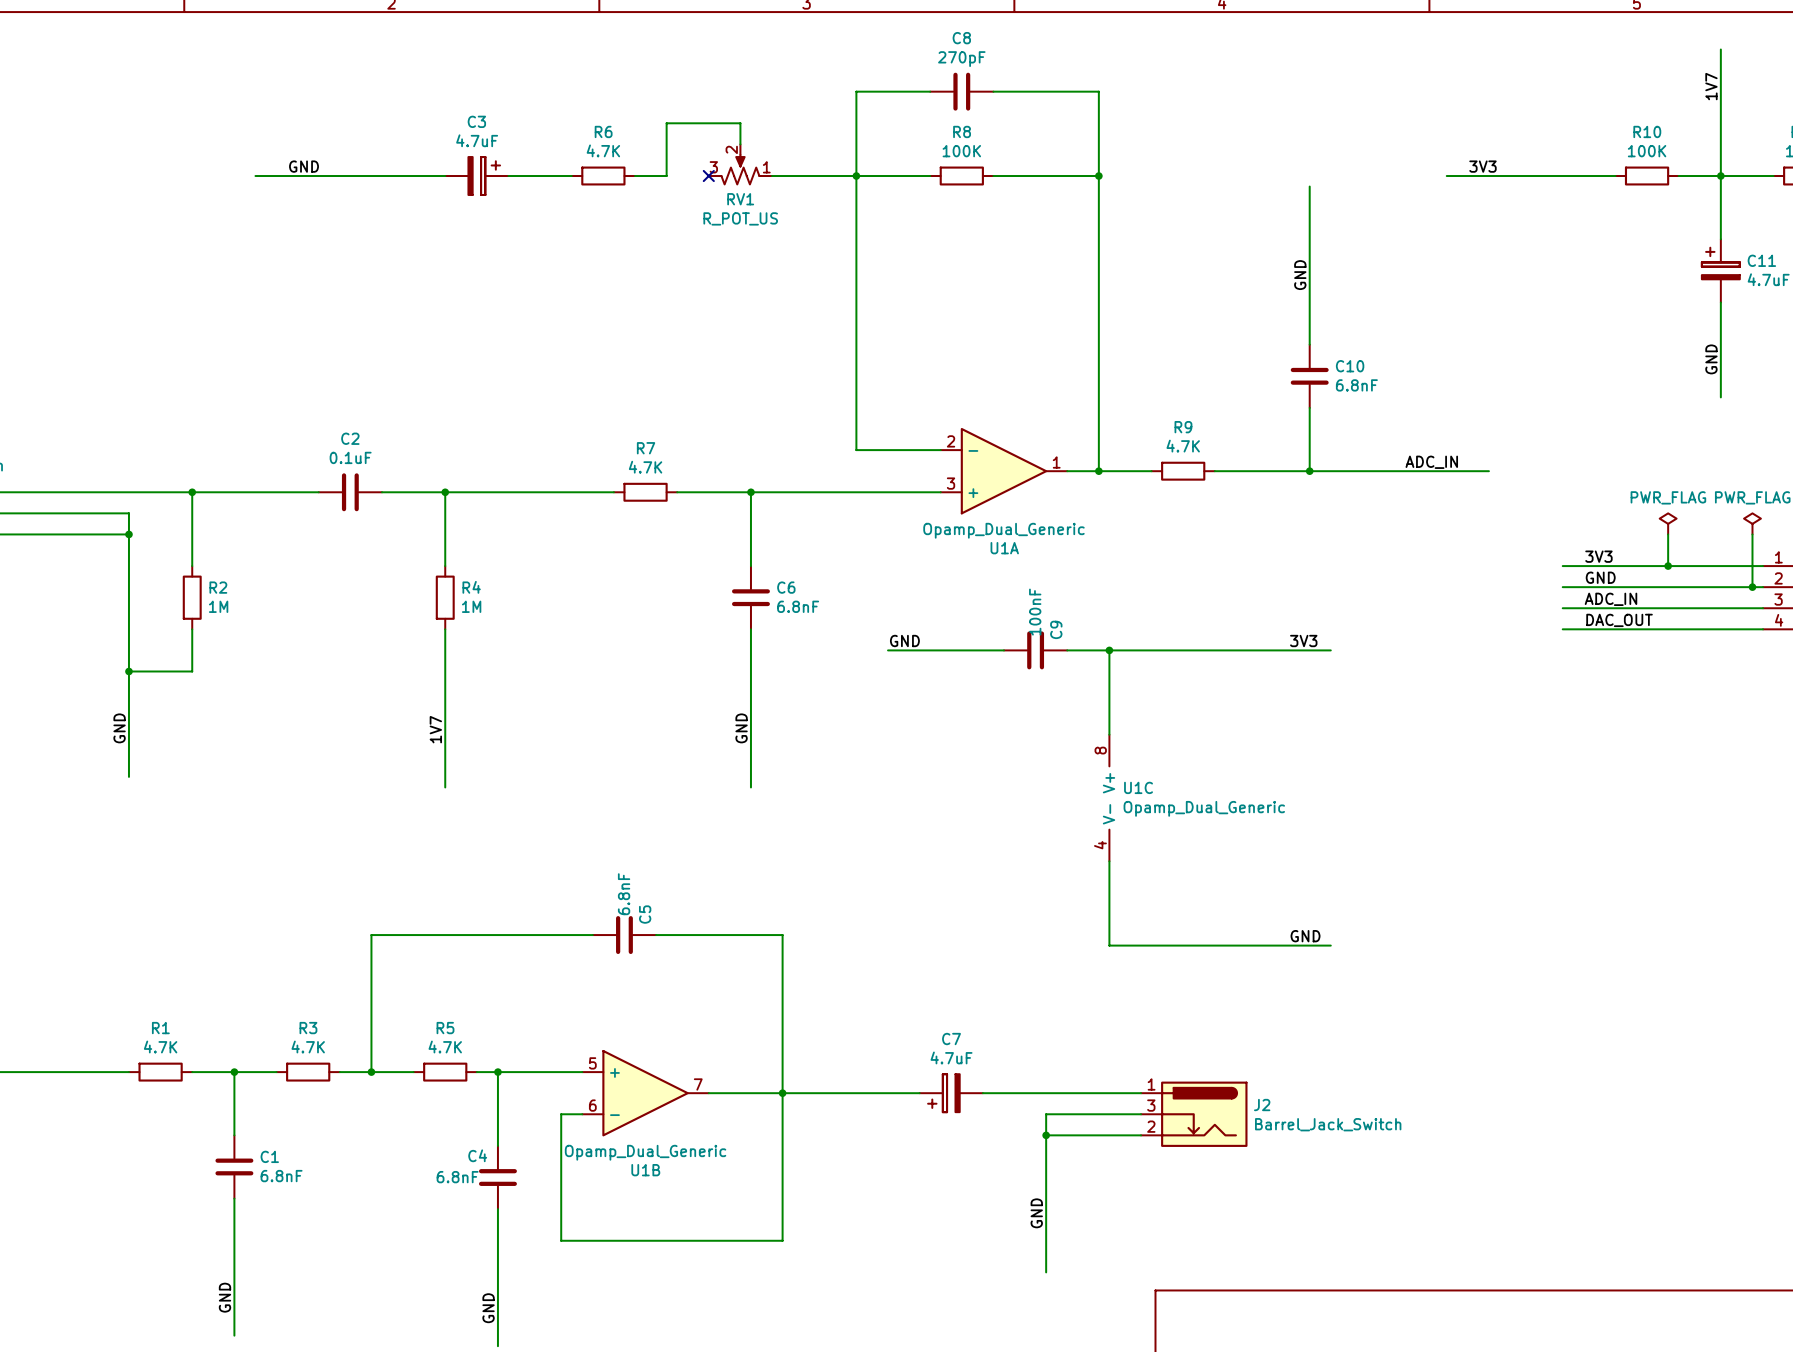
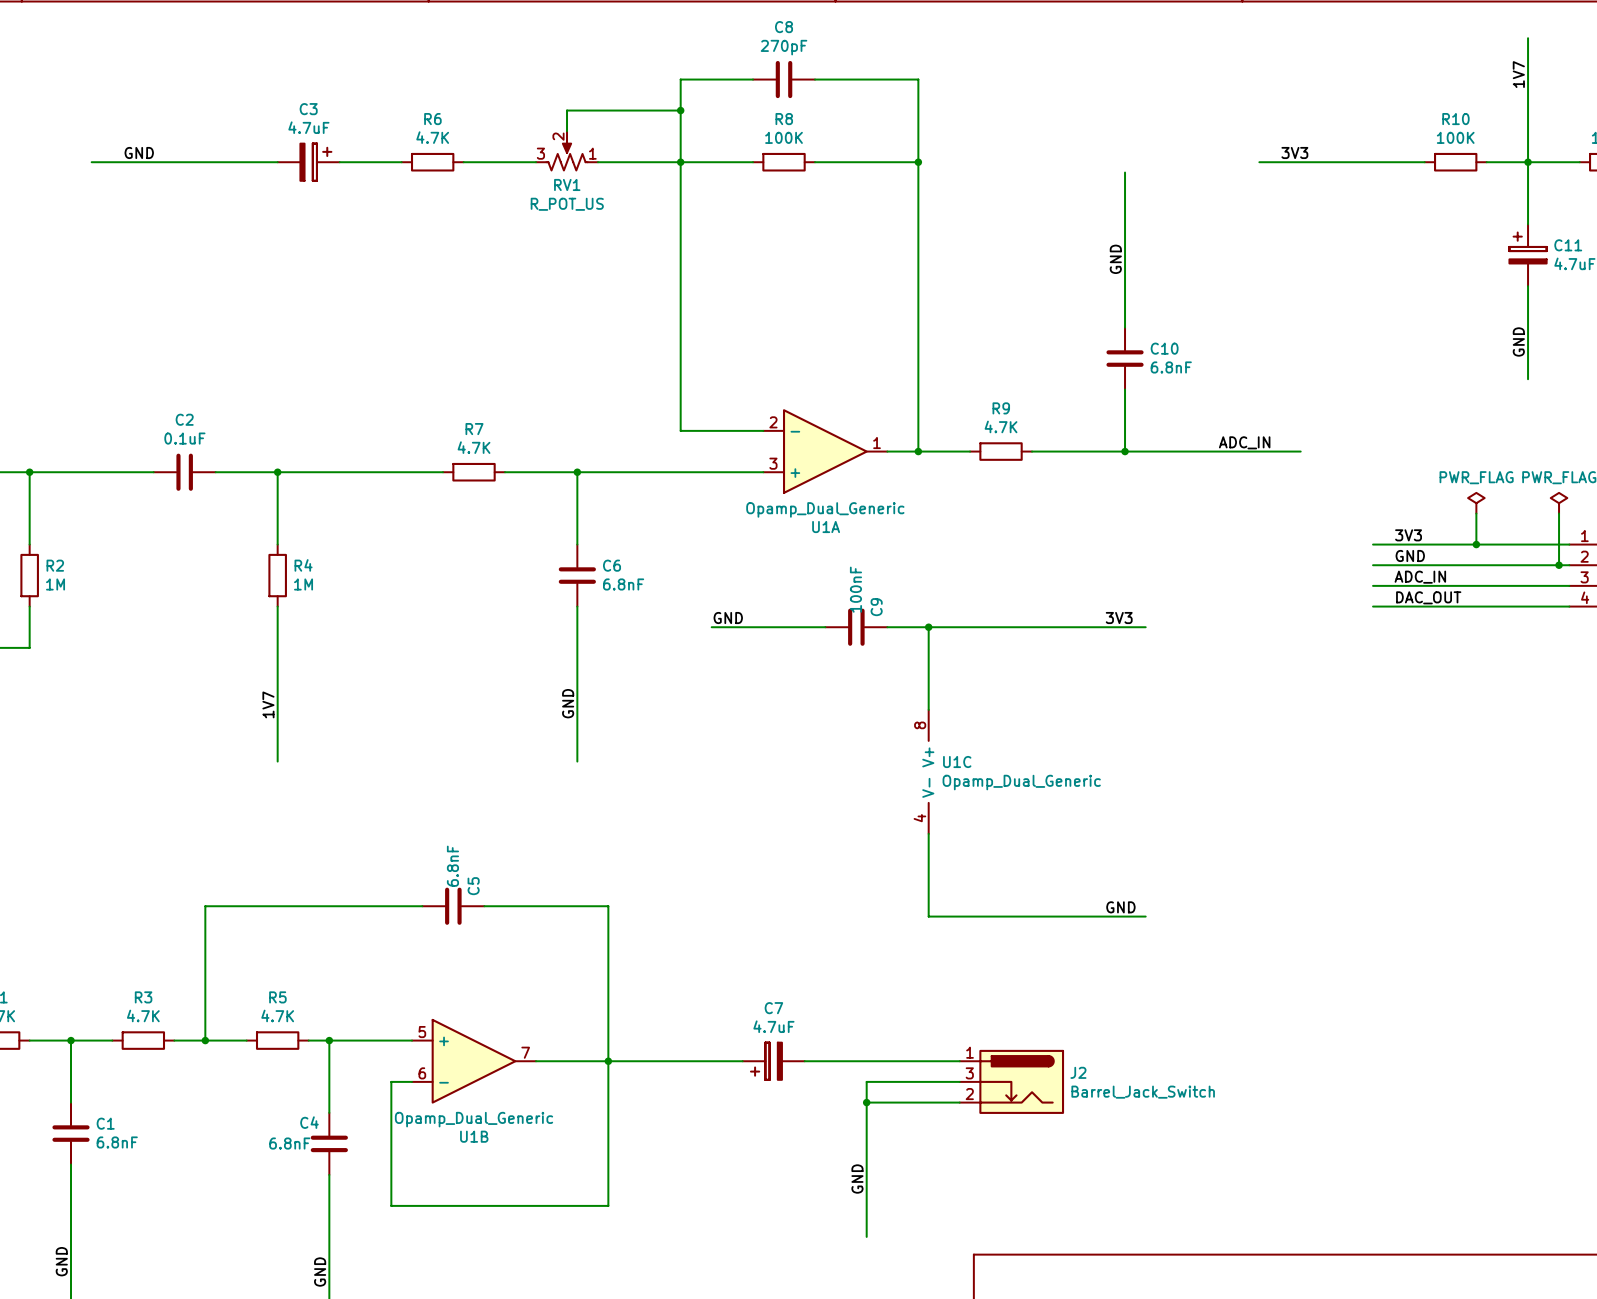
wire: (740, 123) (666, 123) (666, 176) -> (536, 162) (494, 162)
wire: none -> (567, 110) (680, 110)
junction: none -> (680, 110)
no-connect mark: (708, 176) -> none

